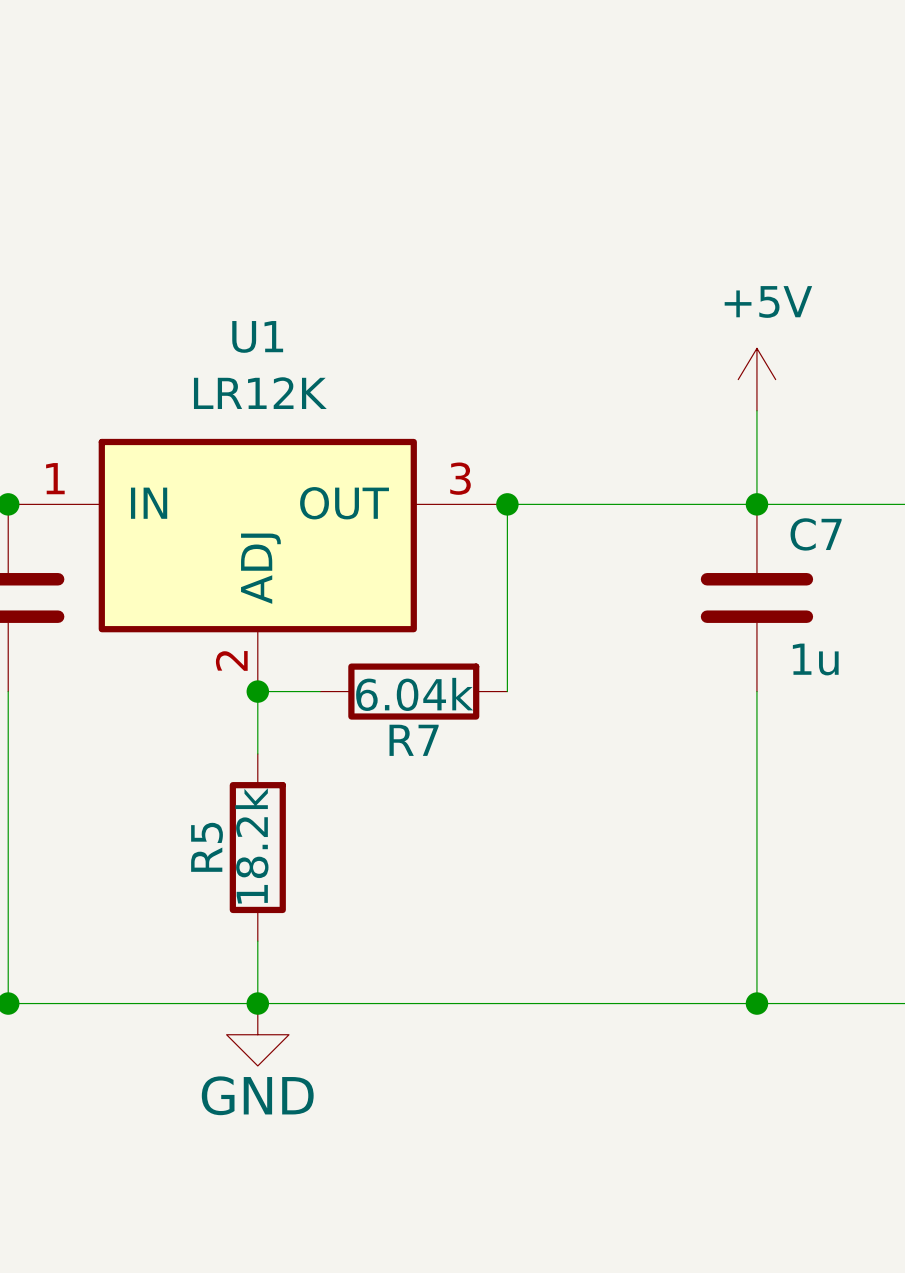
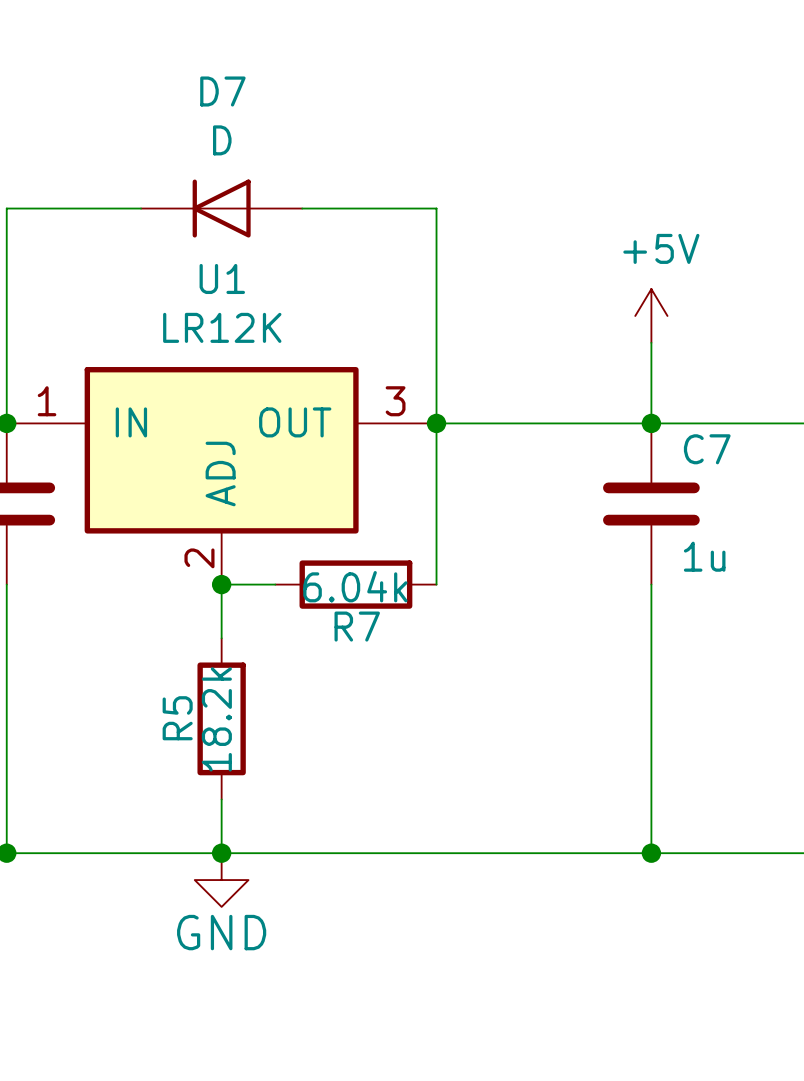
wire: none -> (141, 208) (6, 208) (6, 423)
D7: none -> D (221, 208)
wire: none -> (302, 208) (436, 208) (436, 423)

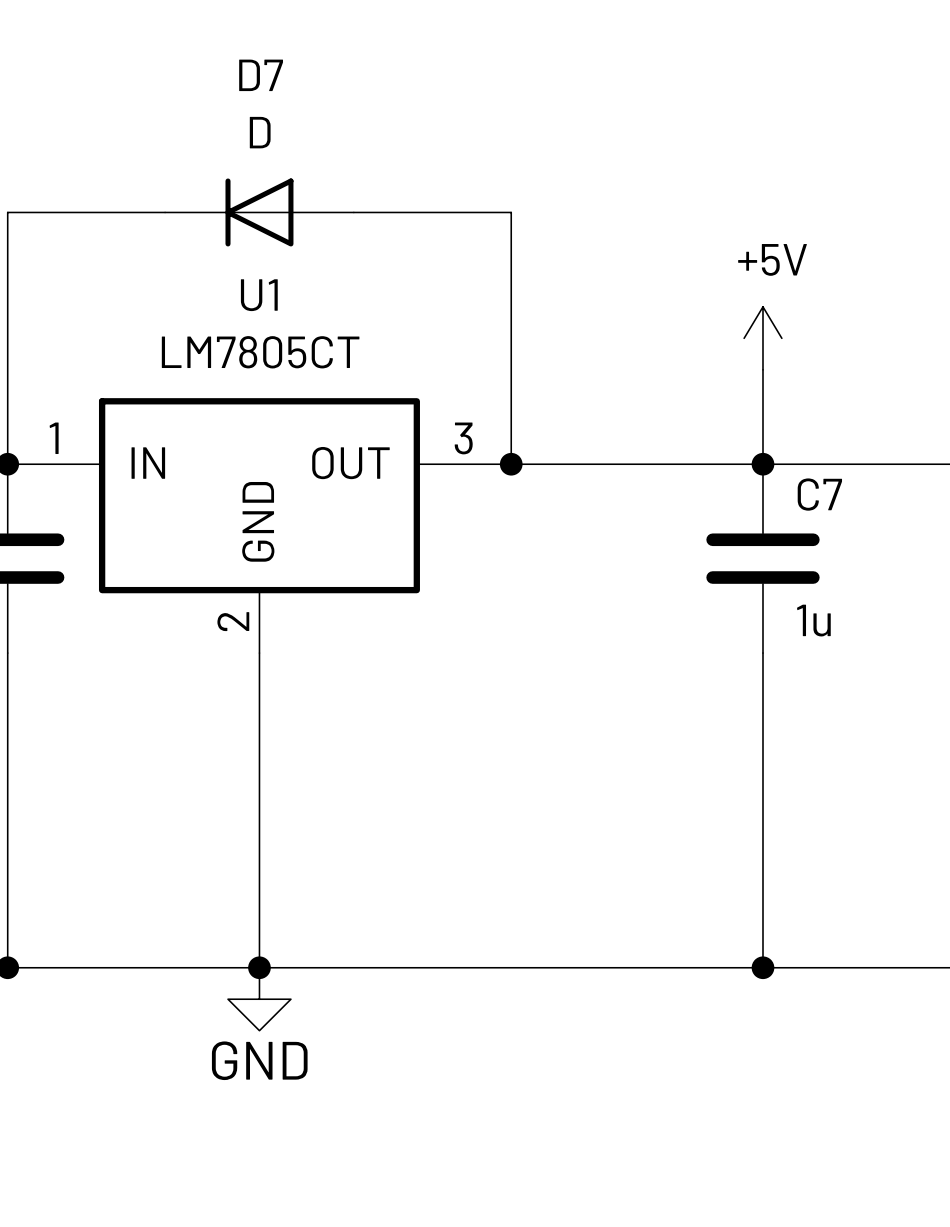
U1 value: LR12K (222, 327) -> LM7805CT (260, 352)
wire: (436, 423) (436, 584) -> (259, 715) (259, 904)
U1 pin name: ADJ (220, 474) -> GND (258, 521)
wire: (221, 584) (275, 584) -> none
junction: (221, 584) -> none
R7: 6.04k (355, 584) -> none
R5: 18.2k (221, 718) -> none

